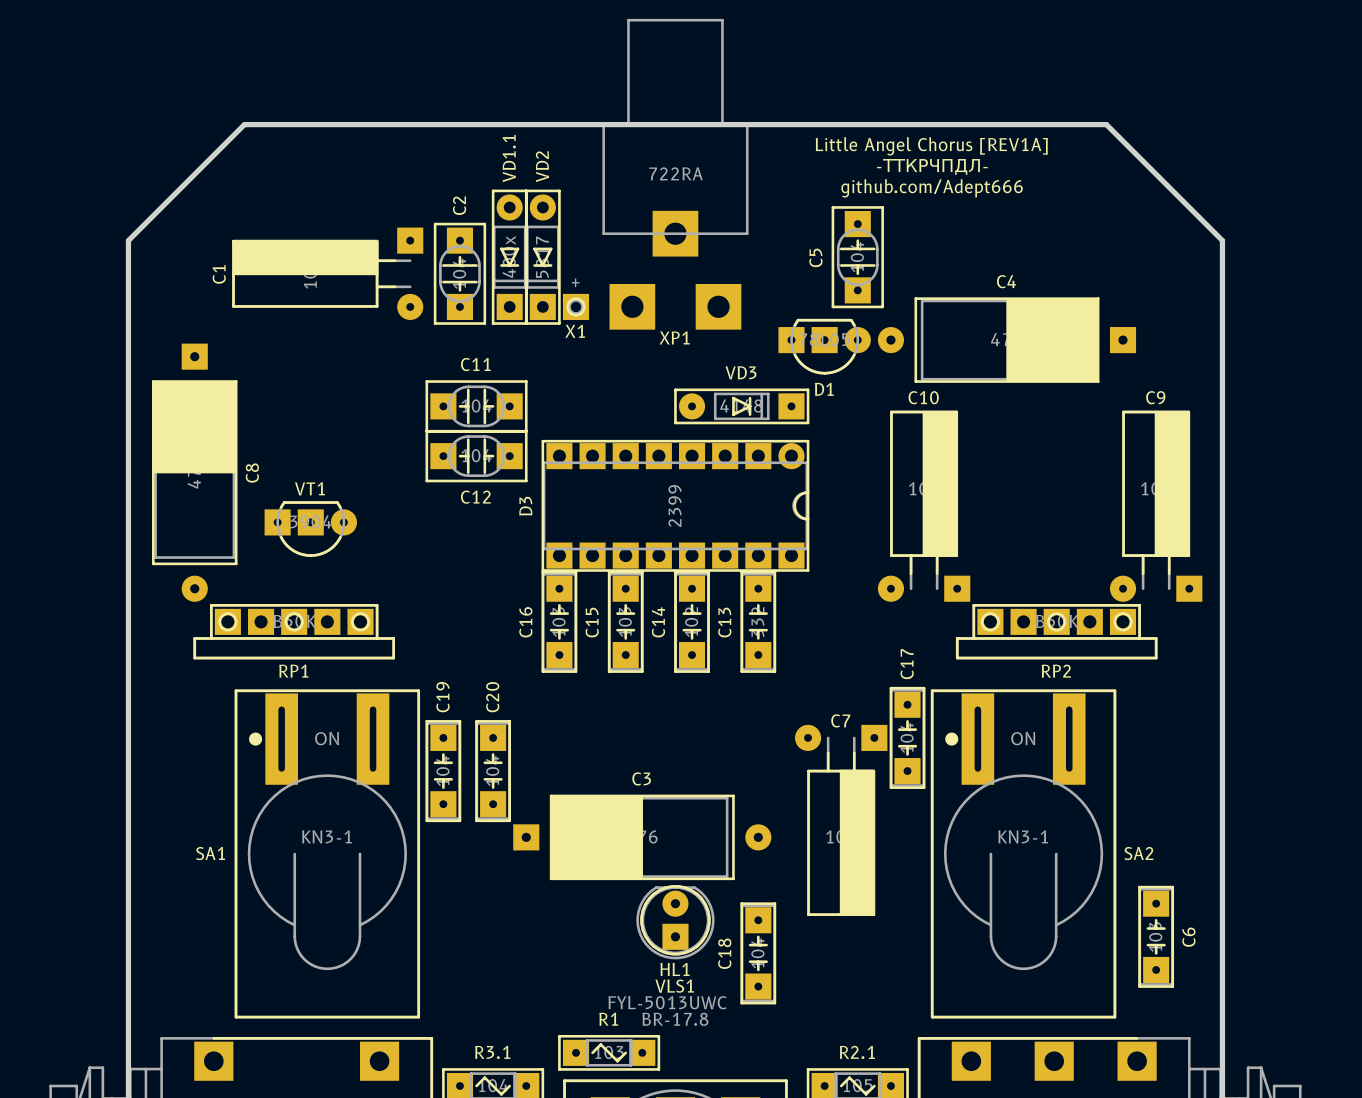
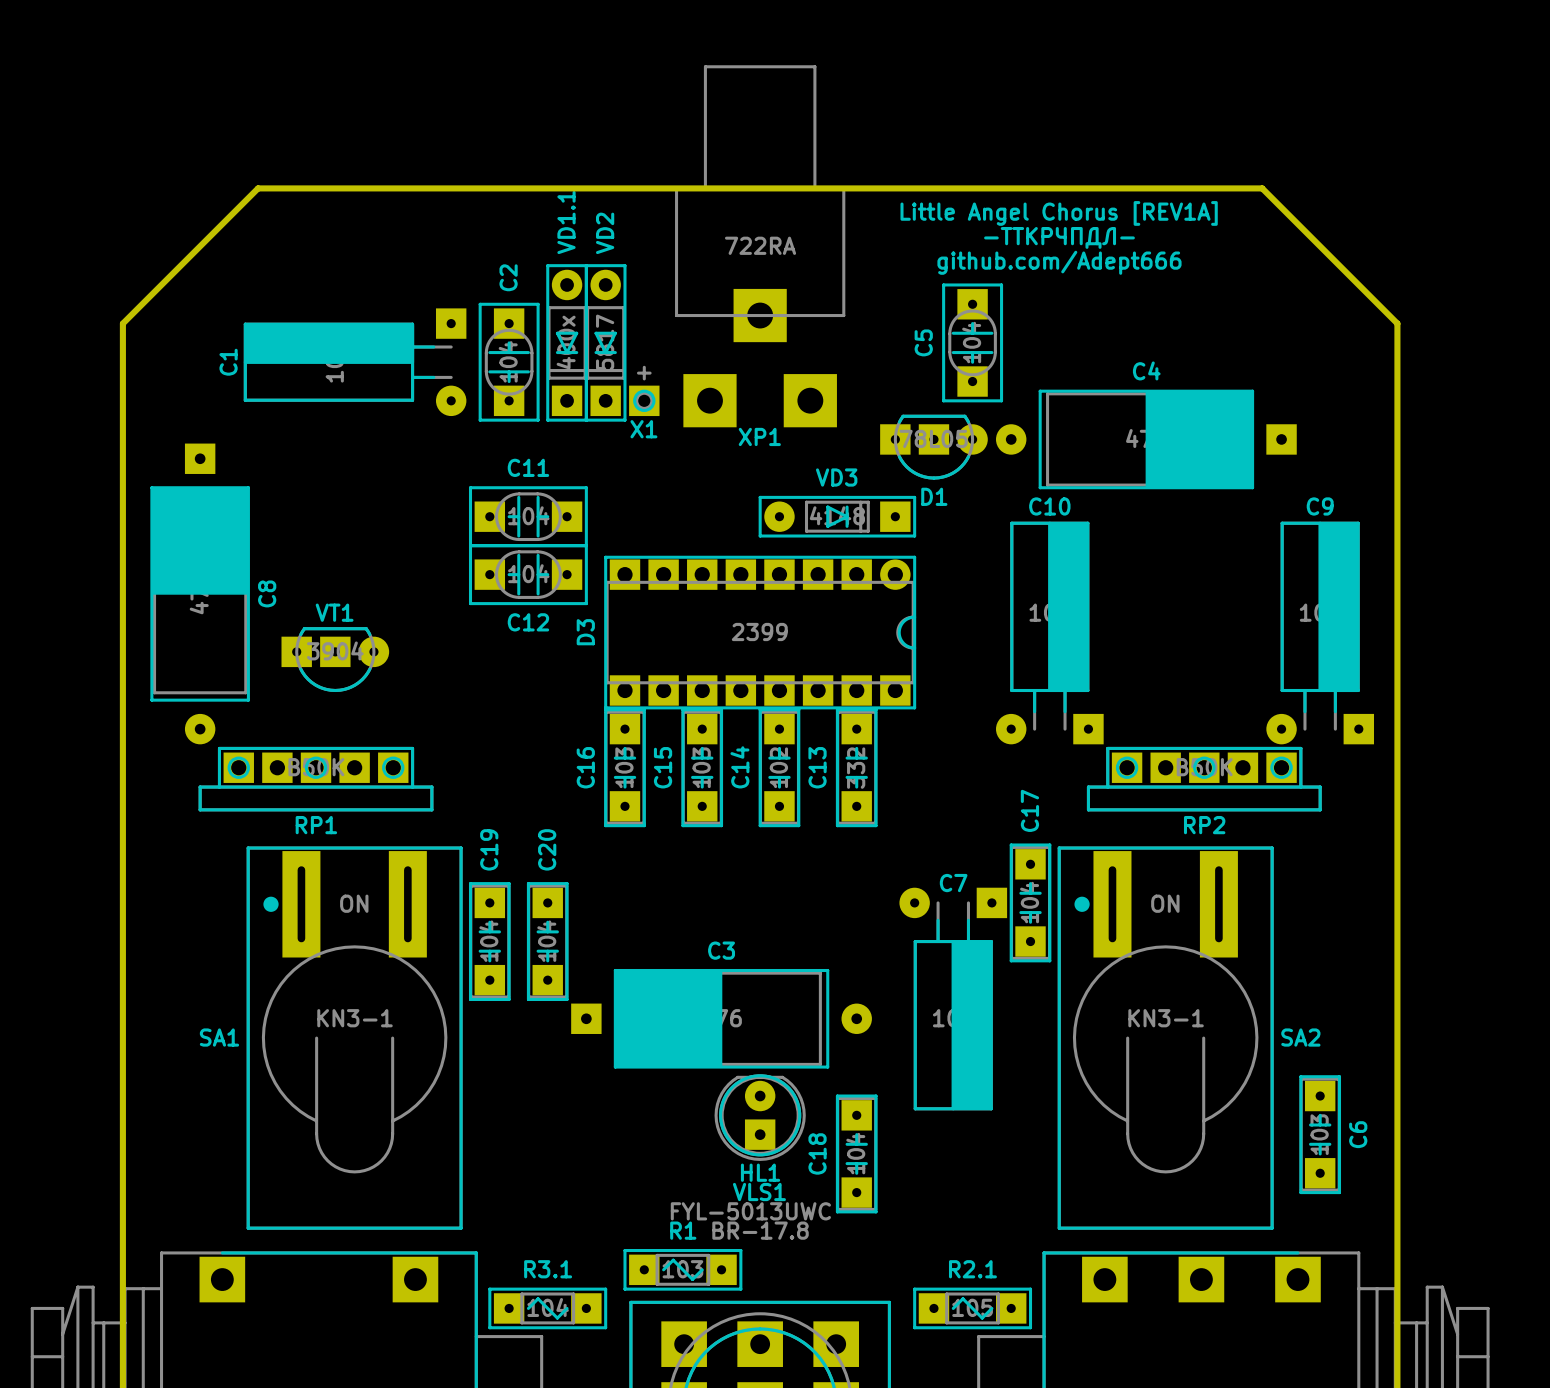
D3 value rotation: 0° (675, 505) -> 90° clockwise (759, 631)

